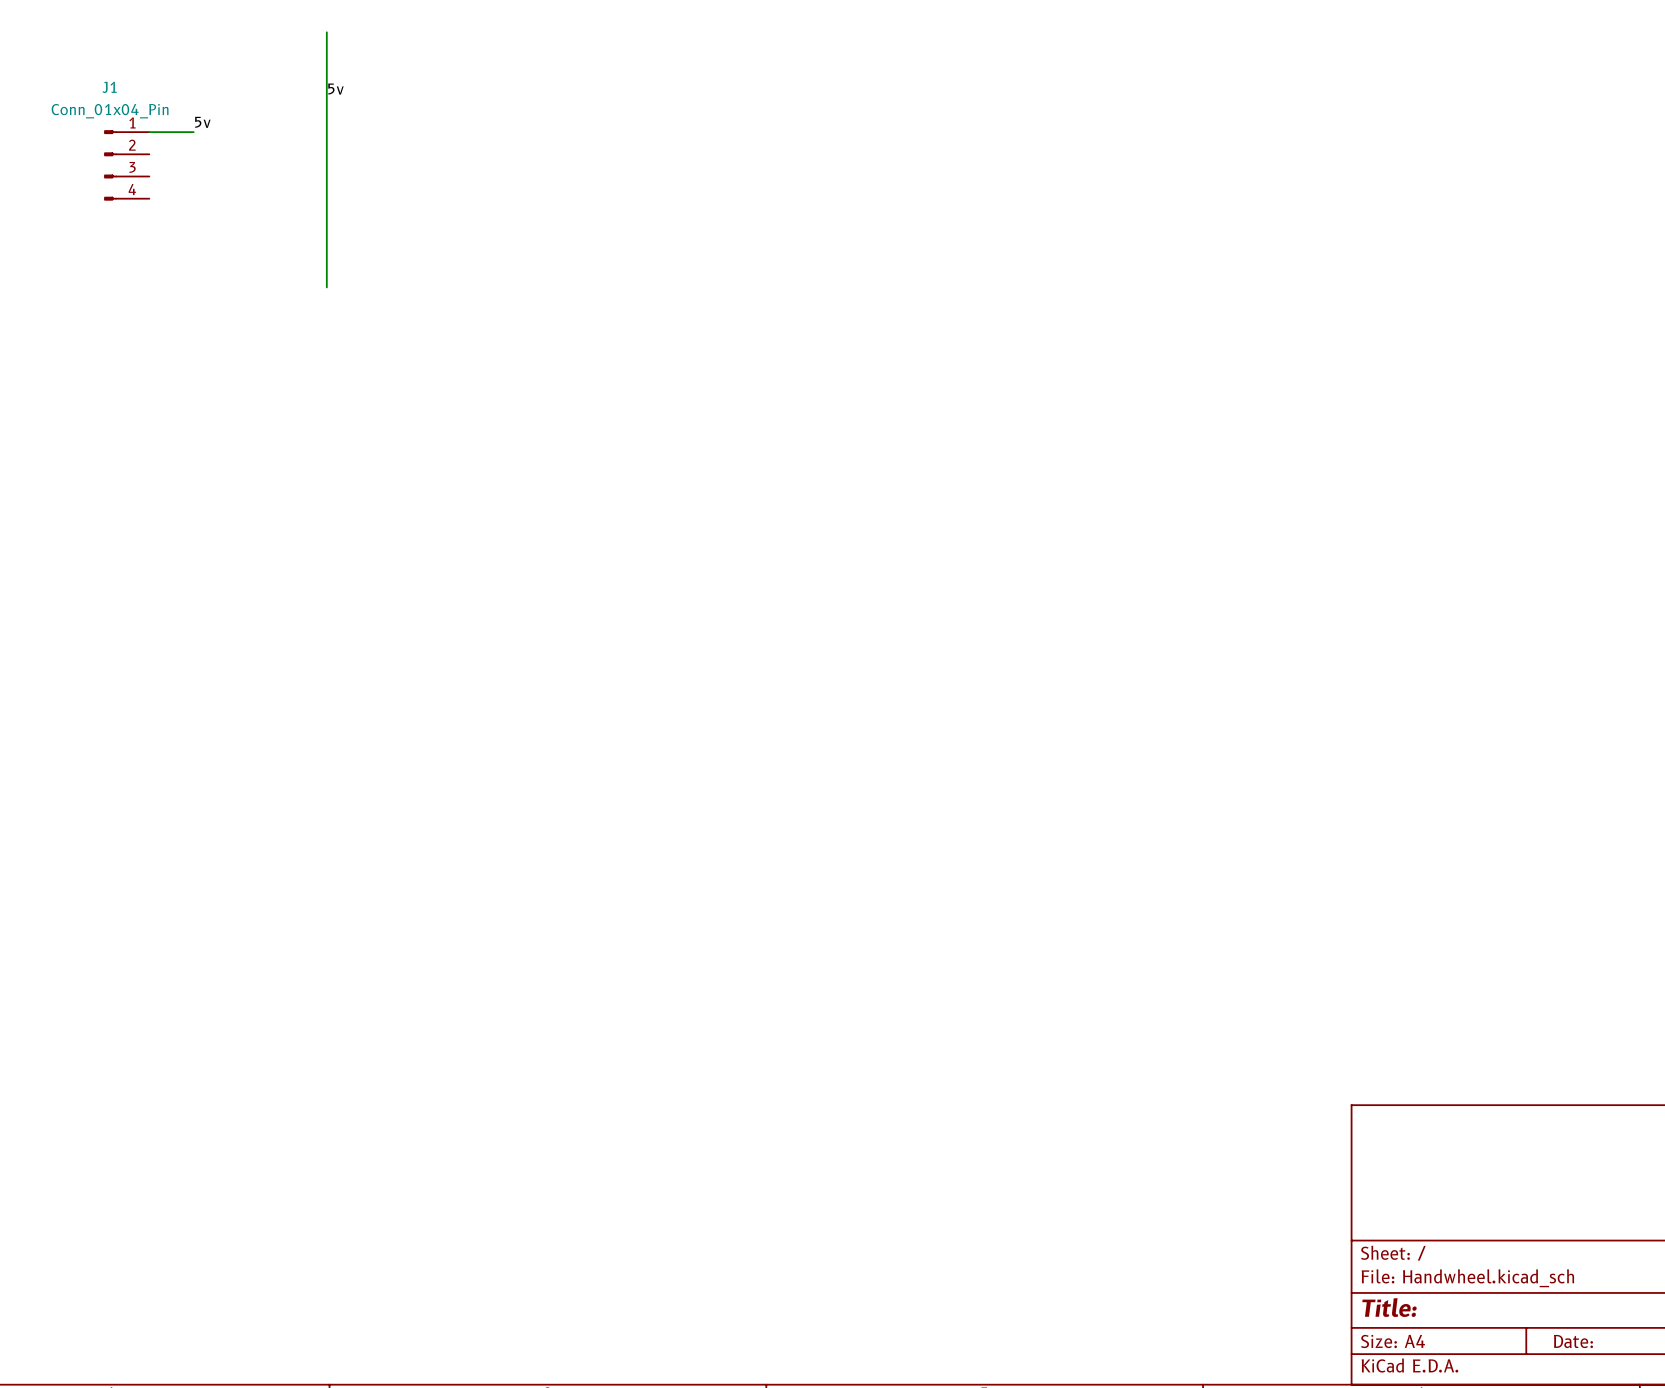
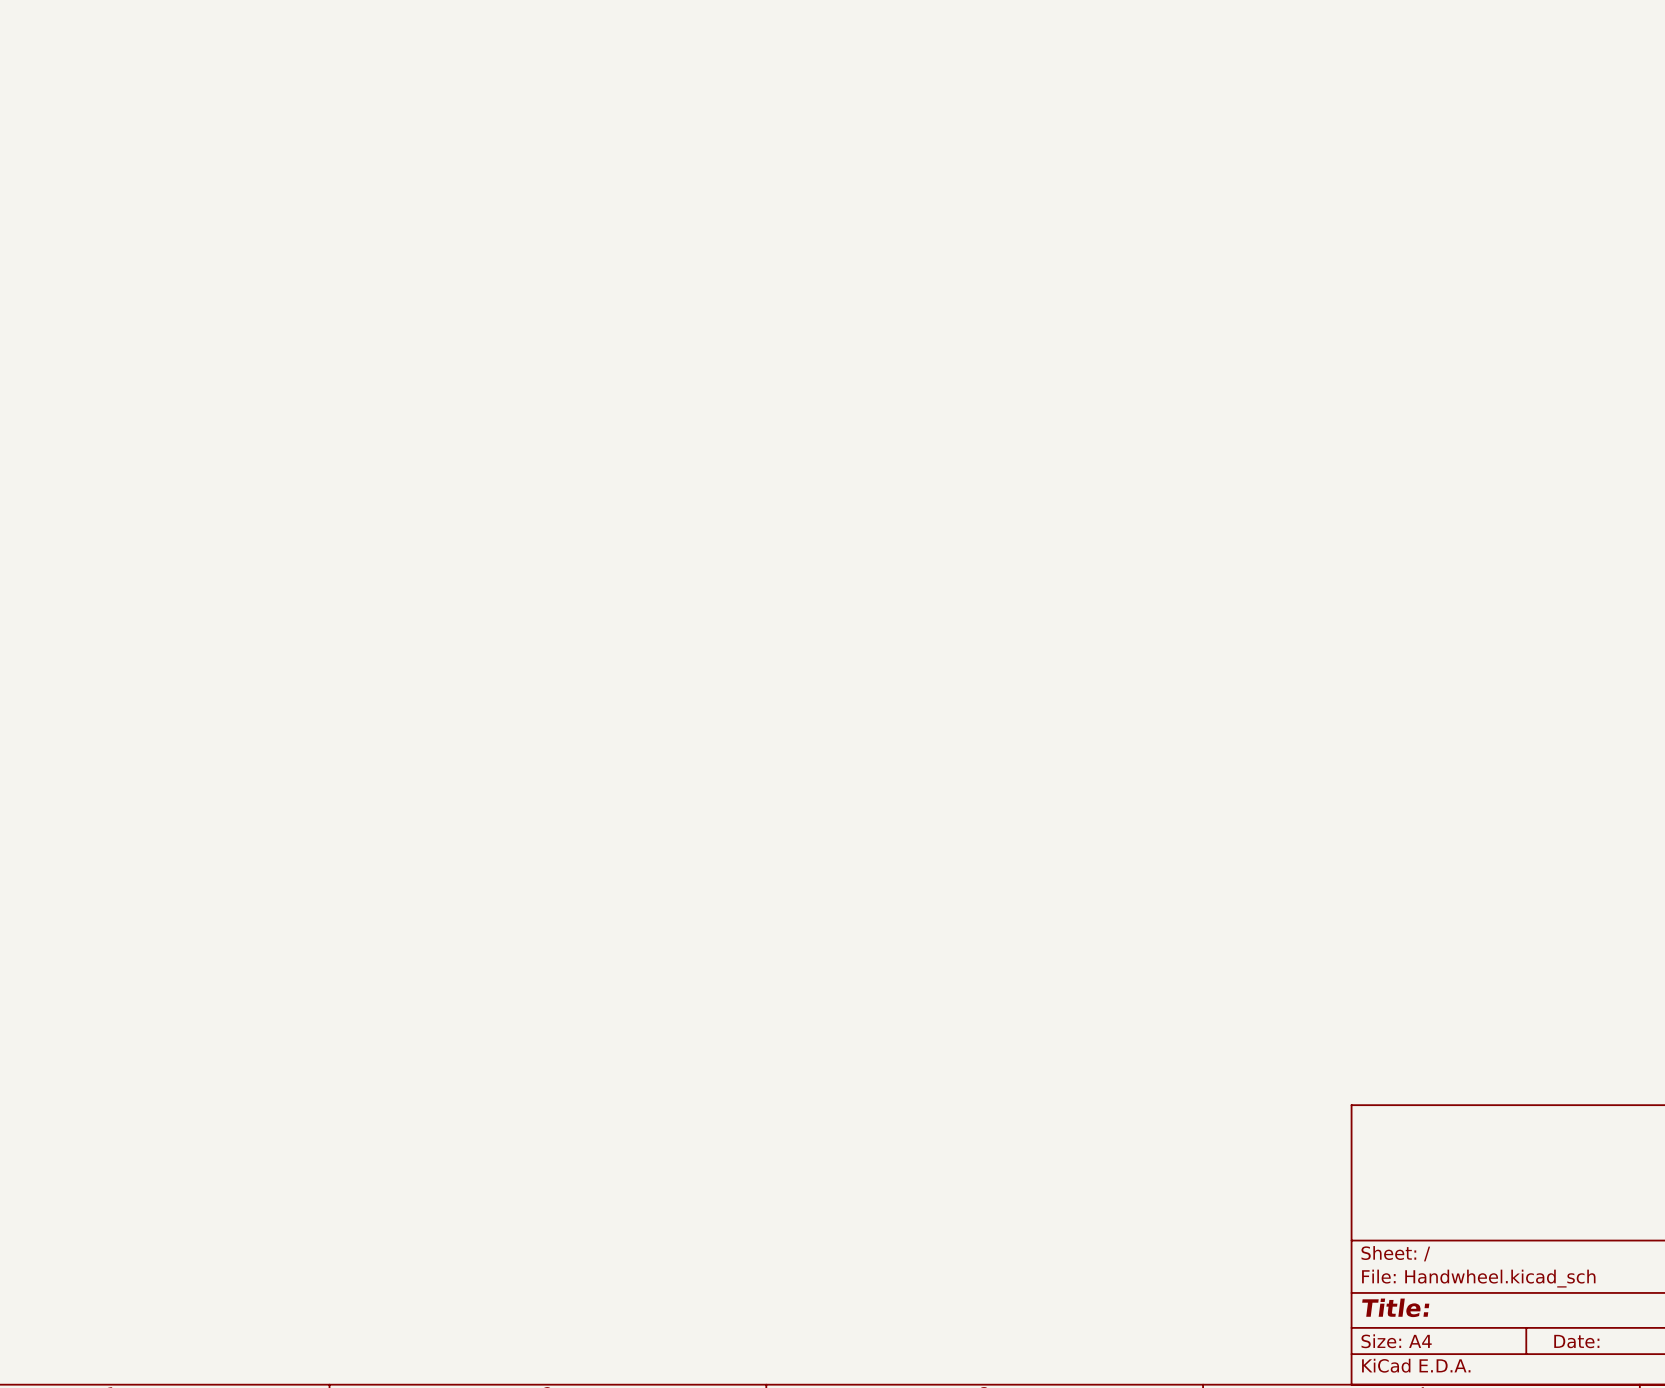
wire: (326, 32) (326, 287) -> none
label: 5v (335, 89) -> none
label: 5v (202, 122) -> none
wire: (149, 132) (193, 132) -> none
J1: Conn_01x04_Pin (126, 165) -> none

